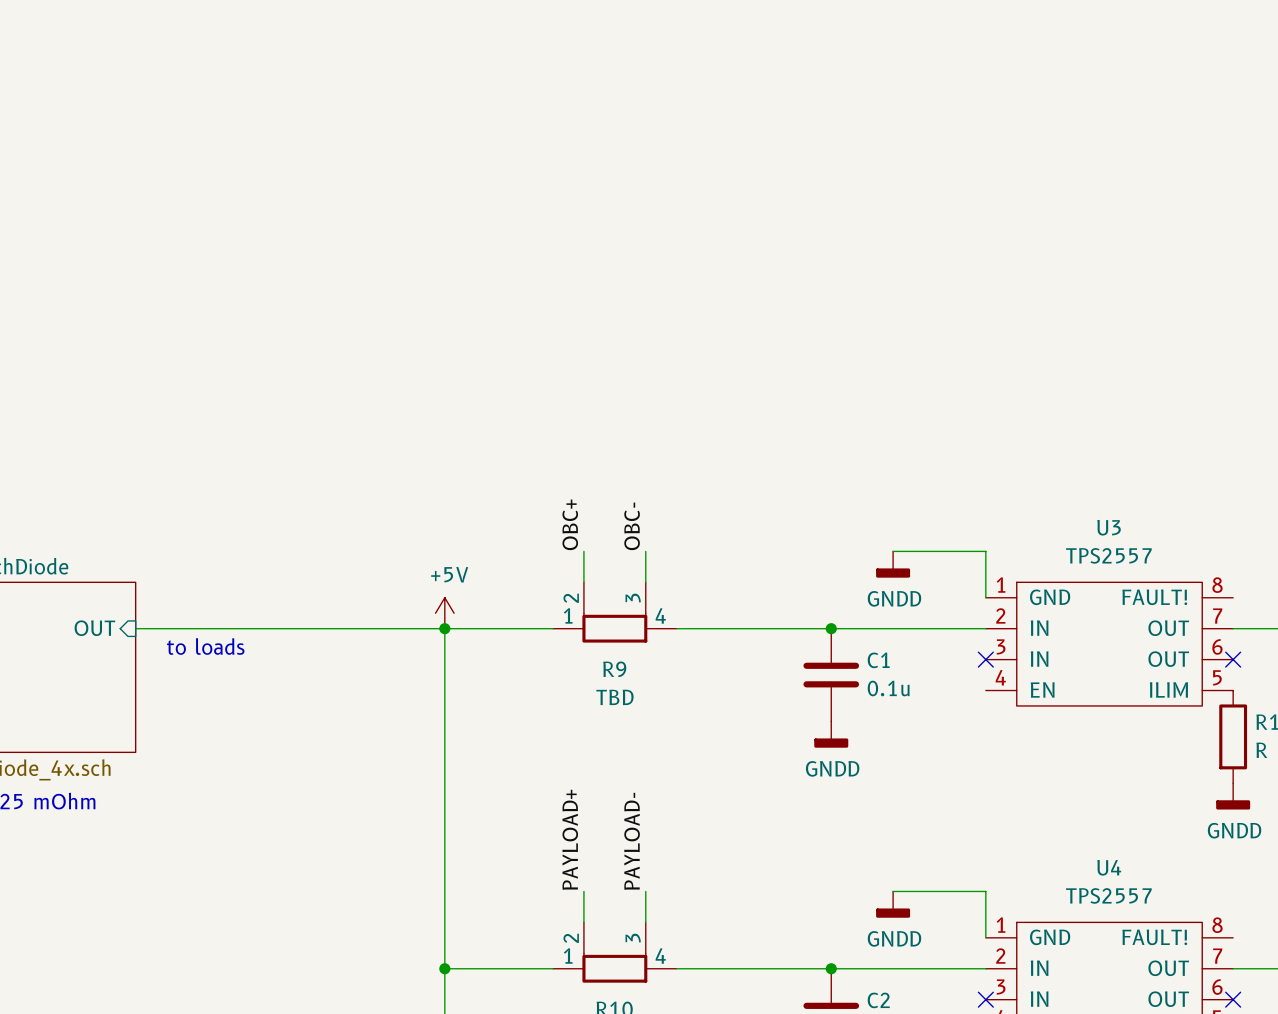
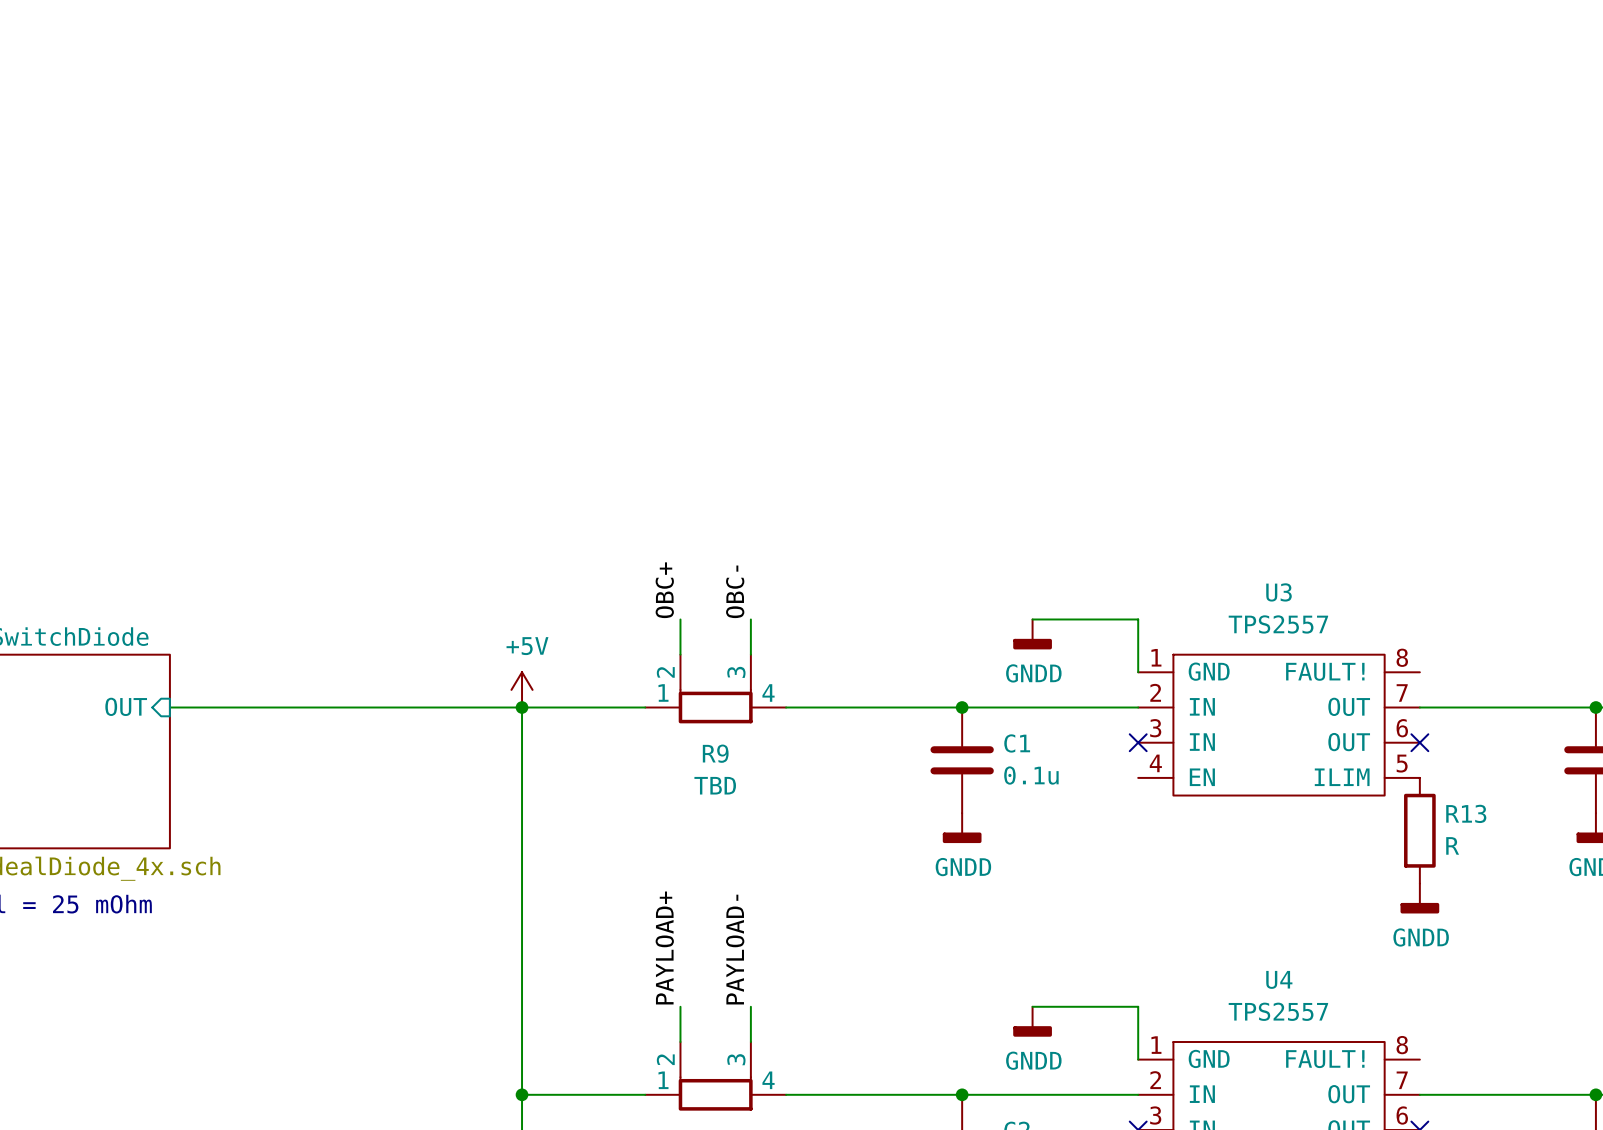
text: to loads (205, 646) -> none

